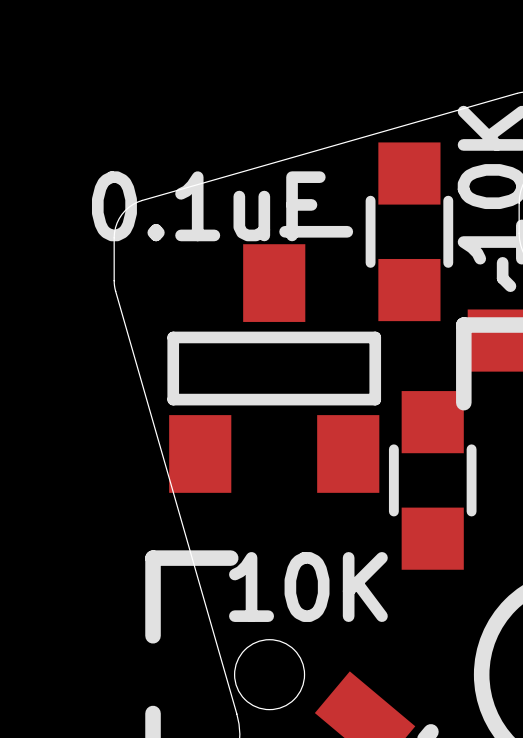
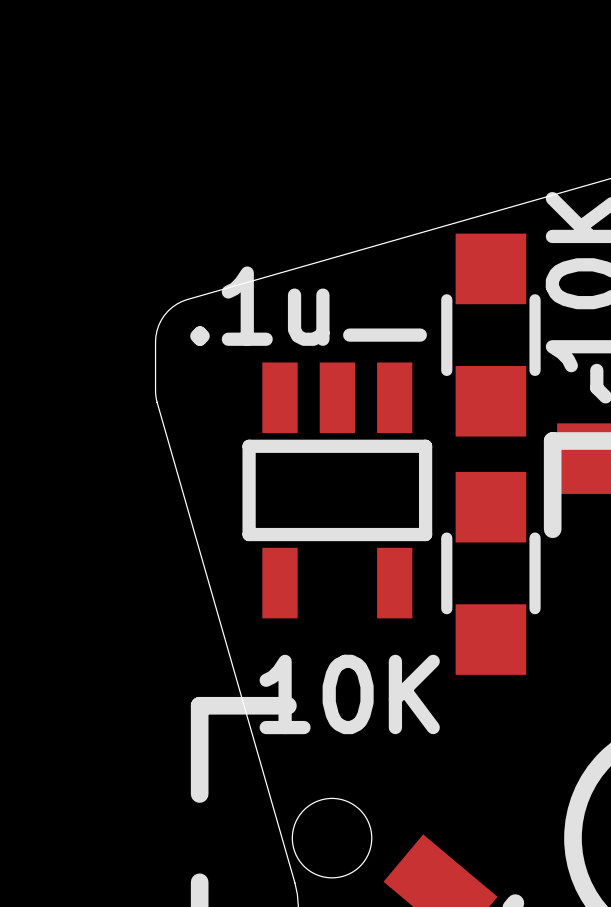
part value: 0.1uF (208, 206) -> .1u (259, 306)
part footprint: [167, 244, 382, 493] -> [242, 362, 433, 619]
part position: (432, 480) -> (490, 573)

